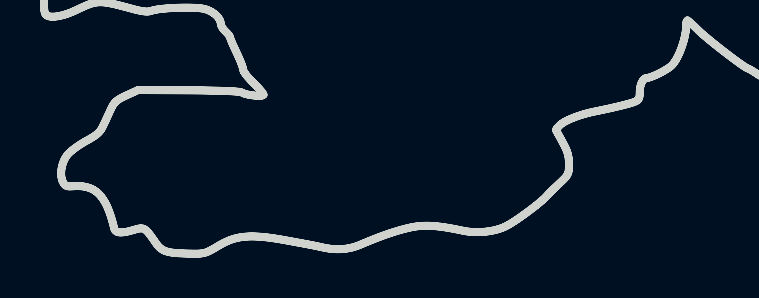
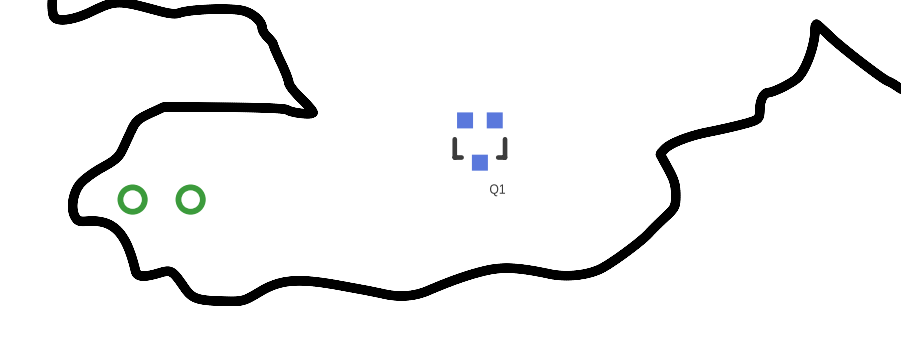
Q1: none -> (479, 141)
part: none -> (161, 199)

